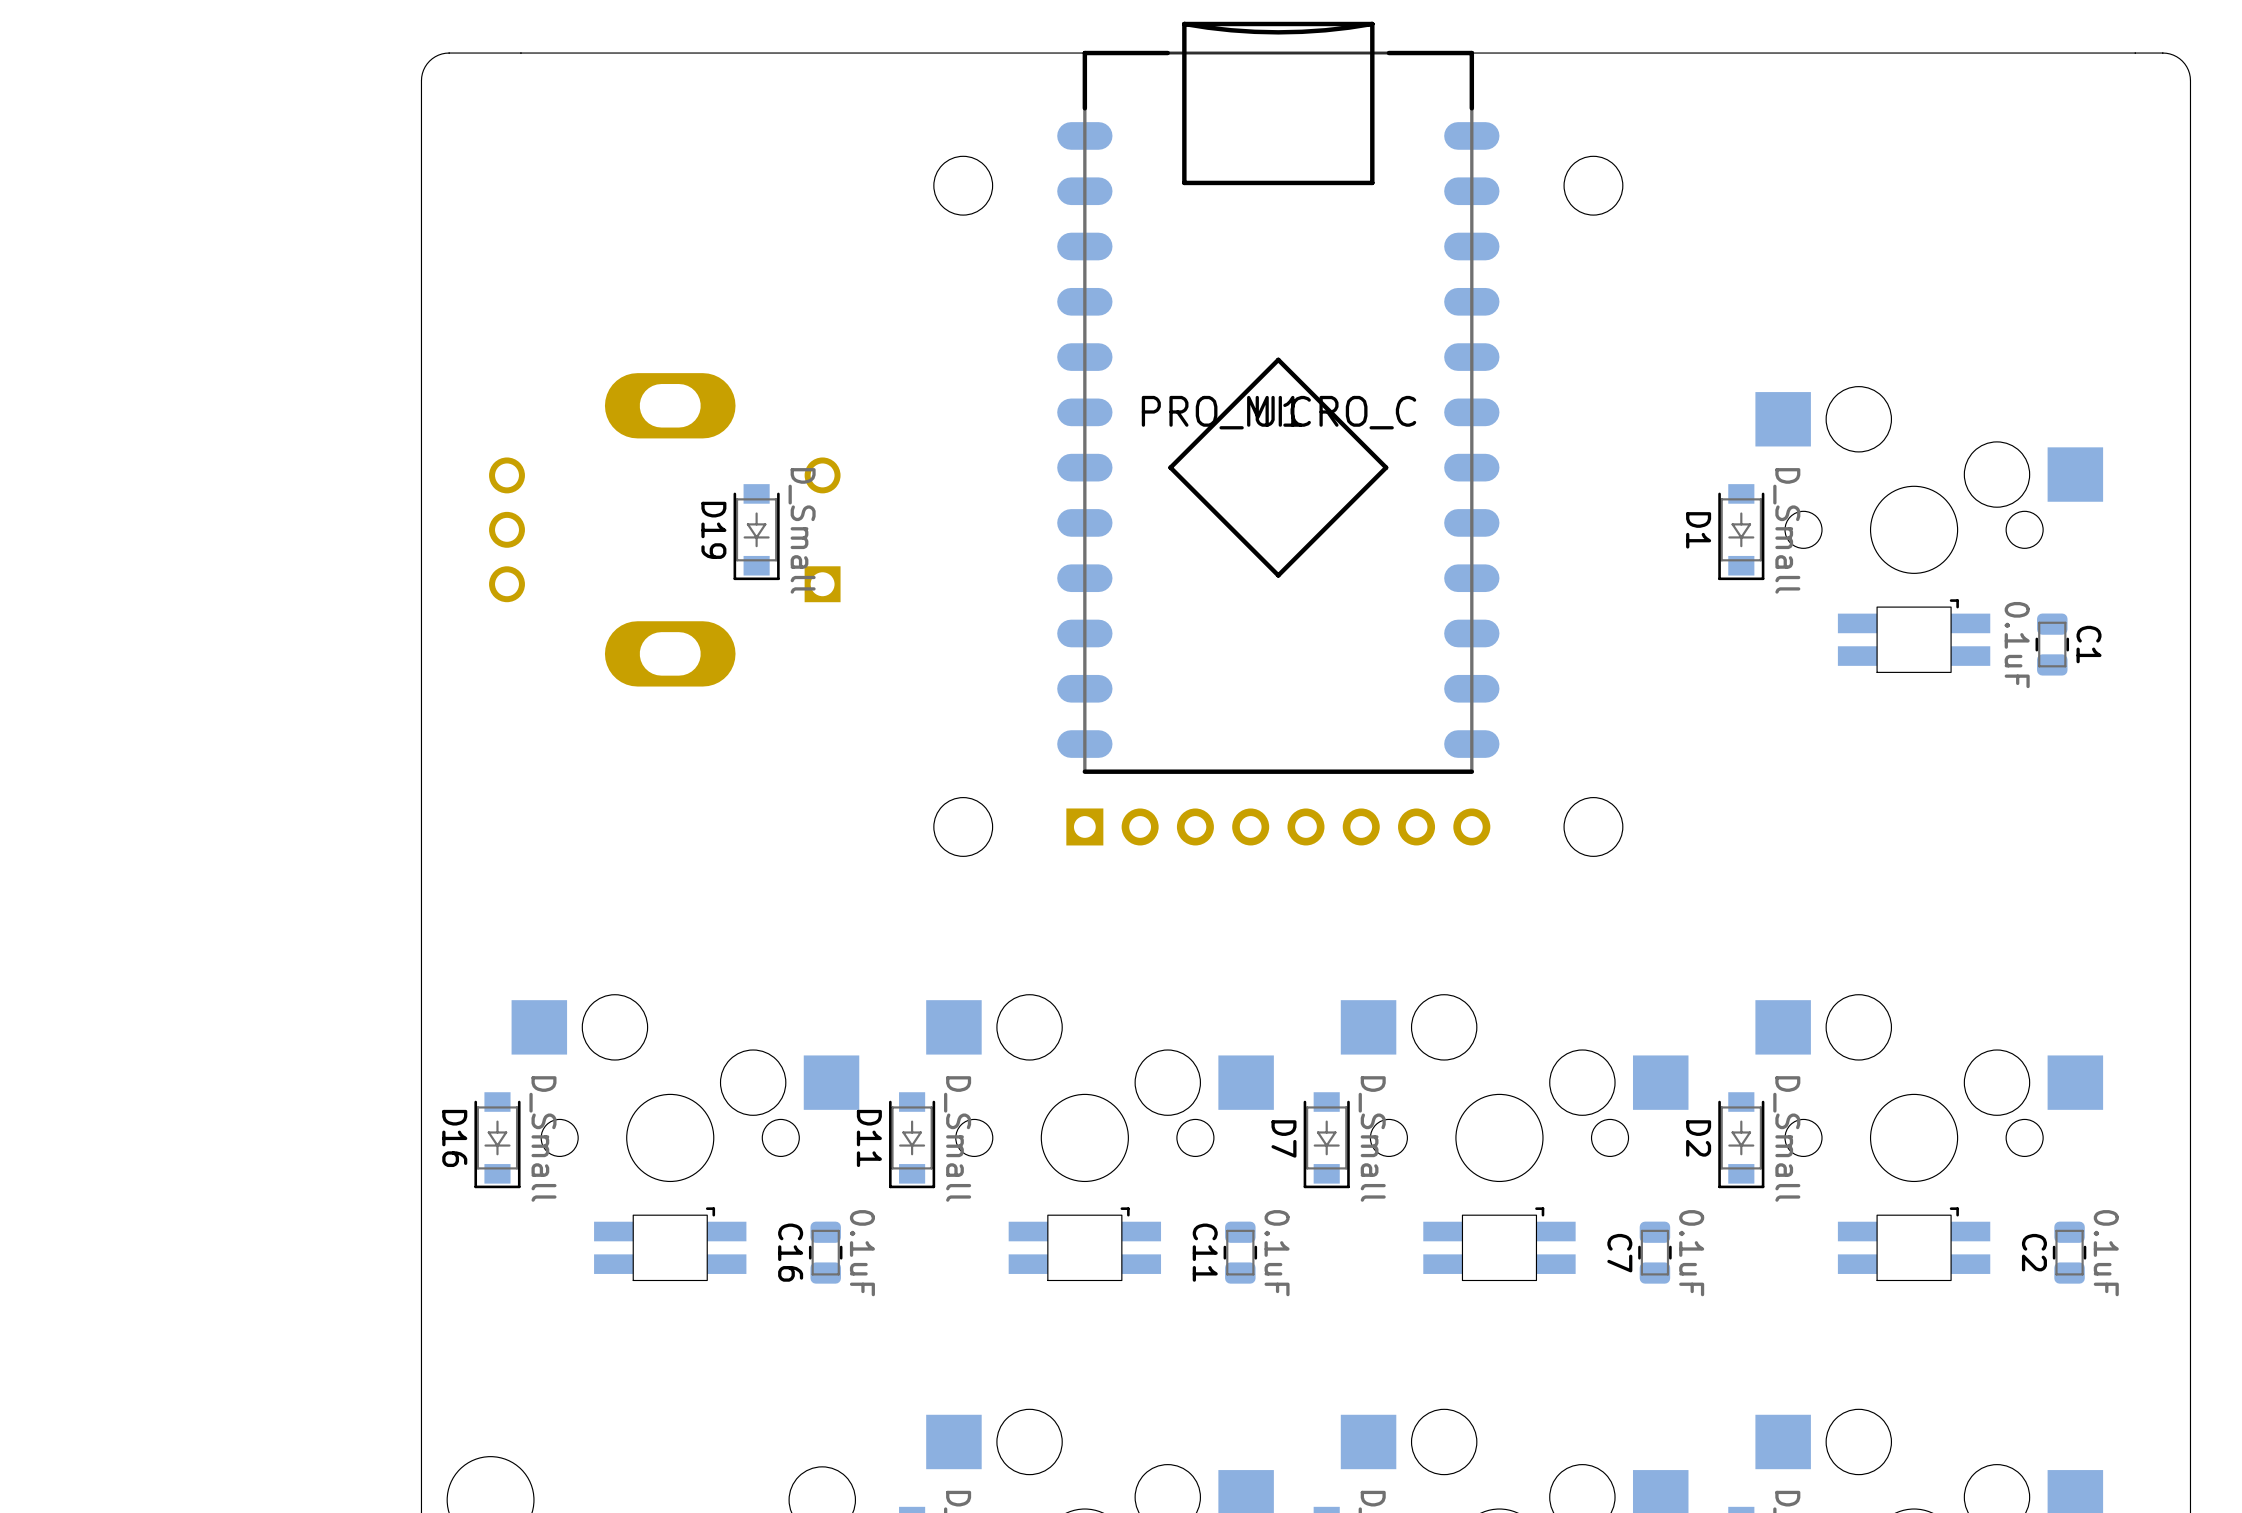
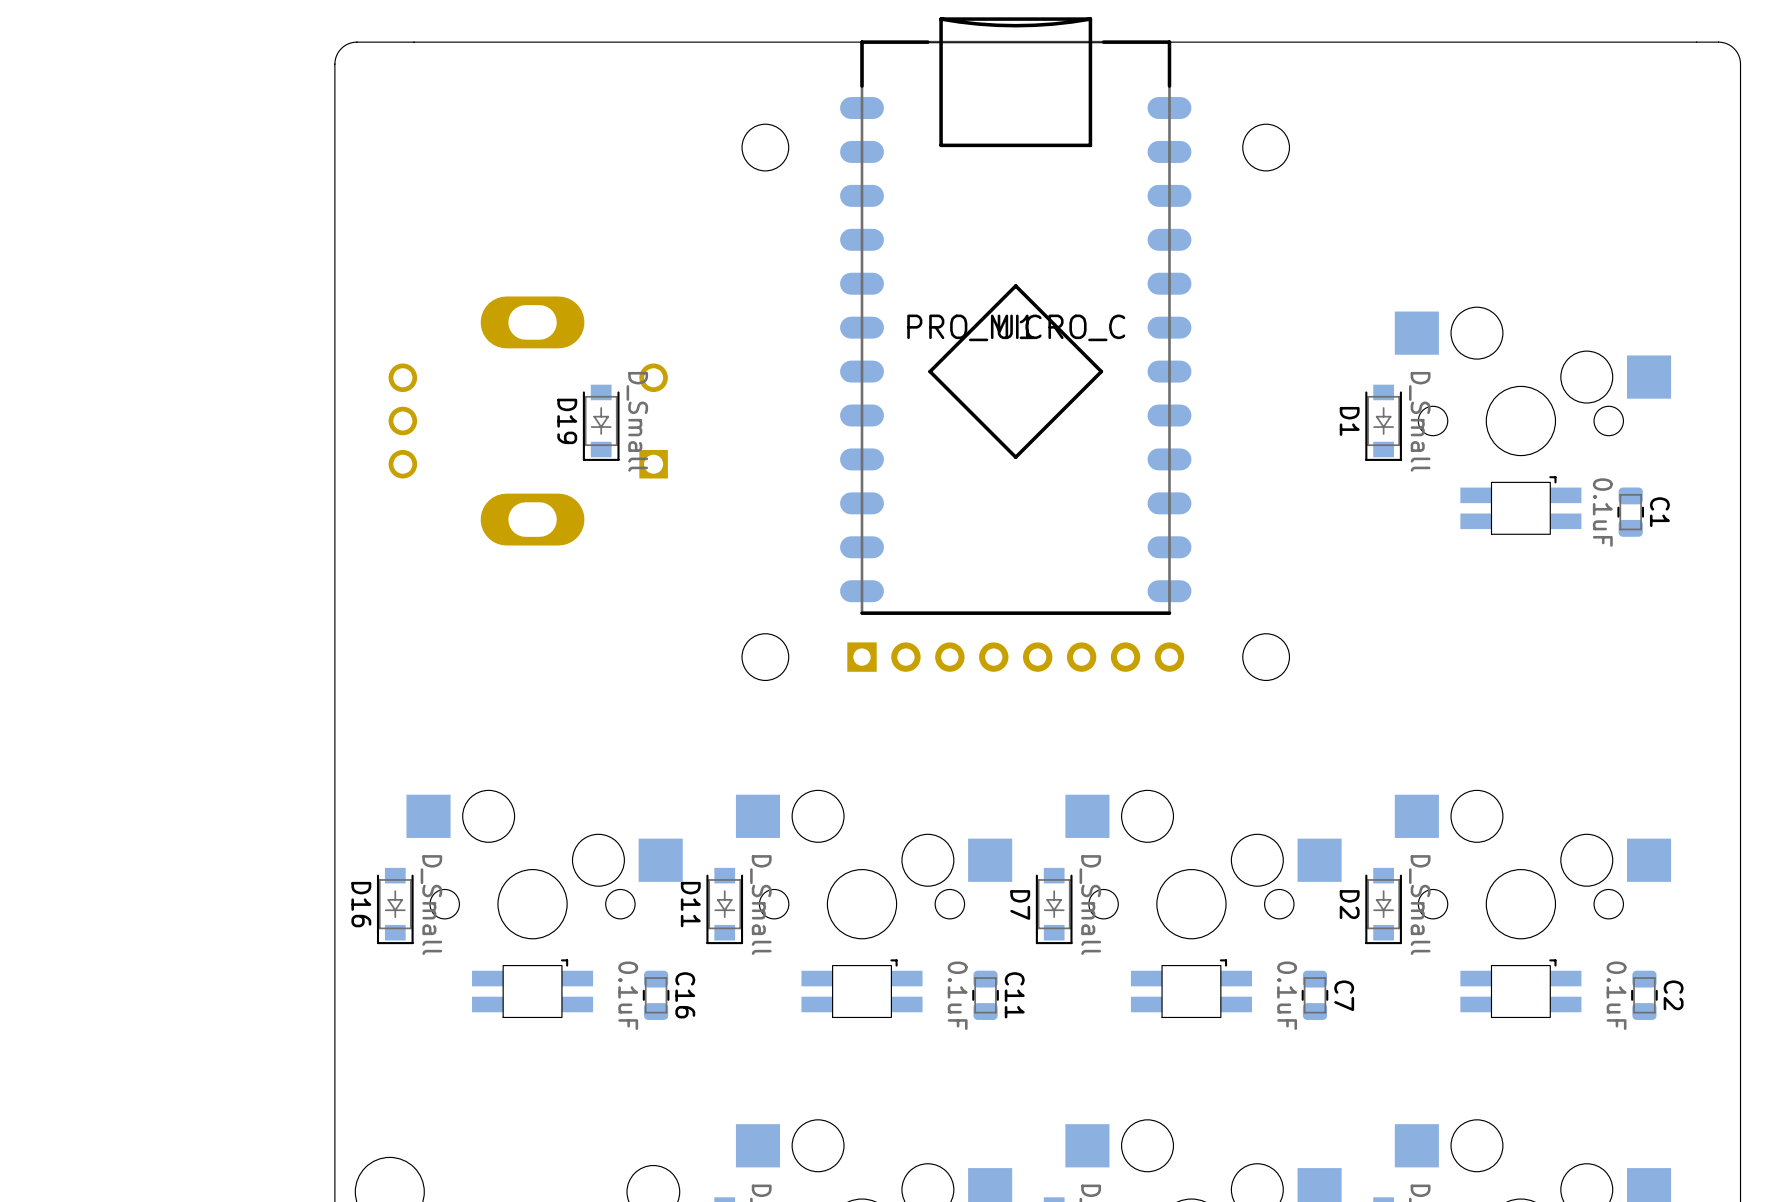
C16 name position: C16 (790, 1252) -> C16 (685, 995)
C11 name position: C11 (1205, 1252) -> C11 (1014, 995)
C2 name position: C2 (2034, 1252) -> C2 (1673, 995)
C16 value position: 0.1uF (862, 1253) -> 0.1uF (628, 995)
C11 value position: 0.1uF (1277, 1253) -> 0.1uF (957, 995)
C7 name position: C7 (1619, 1253) -> C7 (1344, 995)
C7 value position: 0.1uF (1691, 1253) -> 0.1uF (1287, 995)
C2 value position: 0.1uF (2106, 1253) -> 0.1uF (1616, 995)

